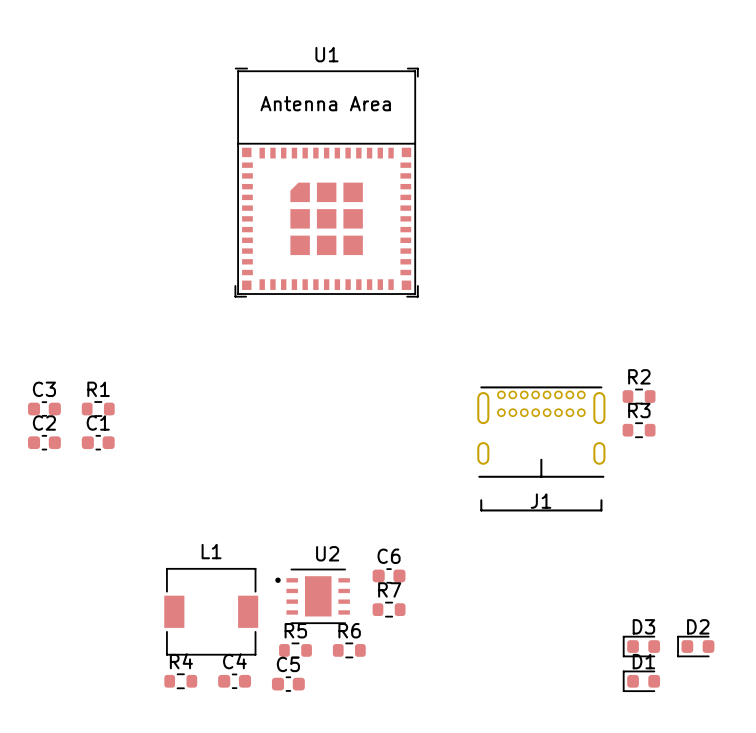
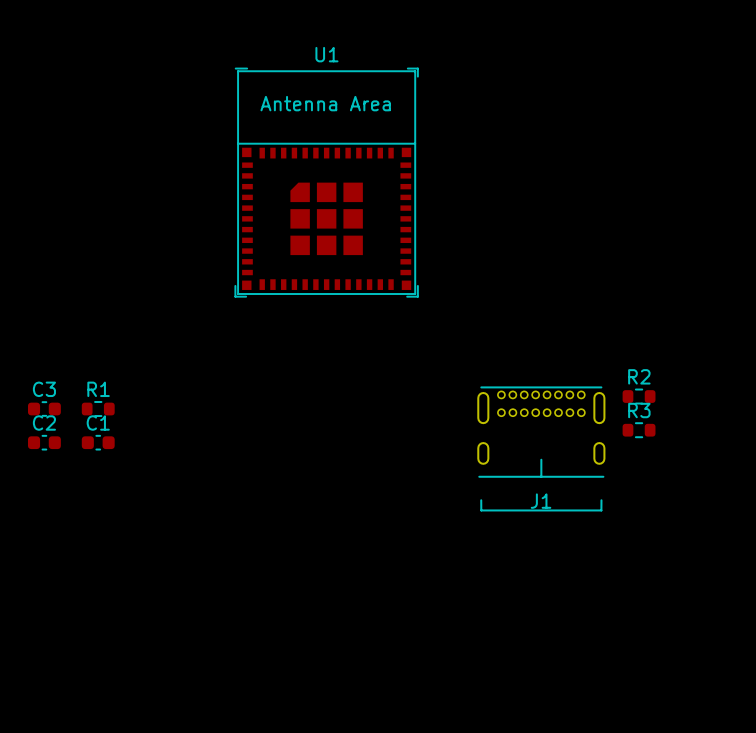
C6: (389, 575) -> none
U2: (312, 596) -> none
R7: (389, 609) -> none
L1: (211, 611) -> none
D3: (641, 646) -> none
D2: (695, 646) -> none
R5: (295, 650) -> none
R6: (349, 650) -> none
R4: (180, 681) -> none
C4: (234, 681) -> none
D1: (641, 681) -> none
C5: (288, 684) -> none

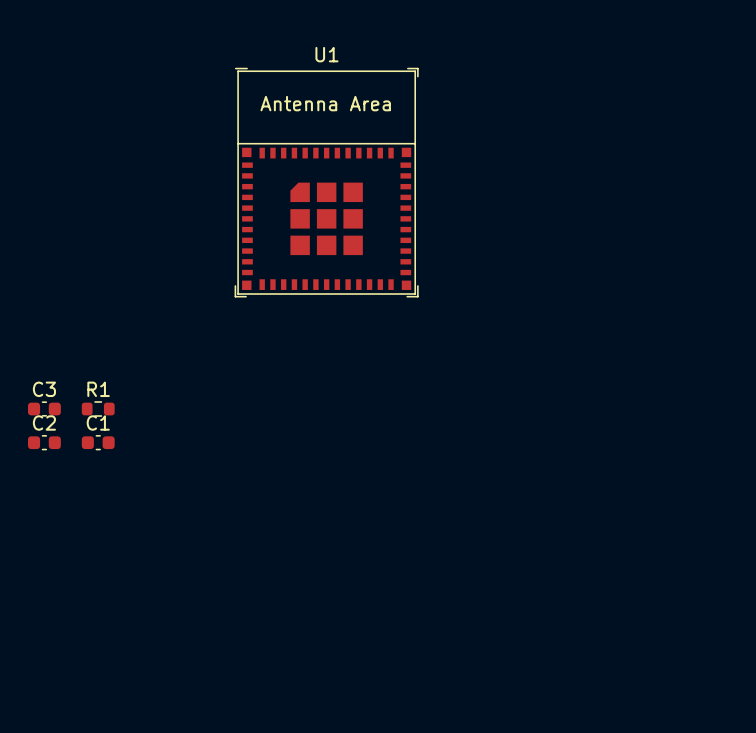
R2: (639, 396) -> none
R3: (639, 430) -> none
J1: (541, 448) -> none

